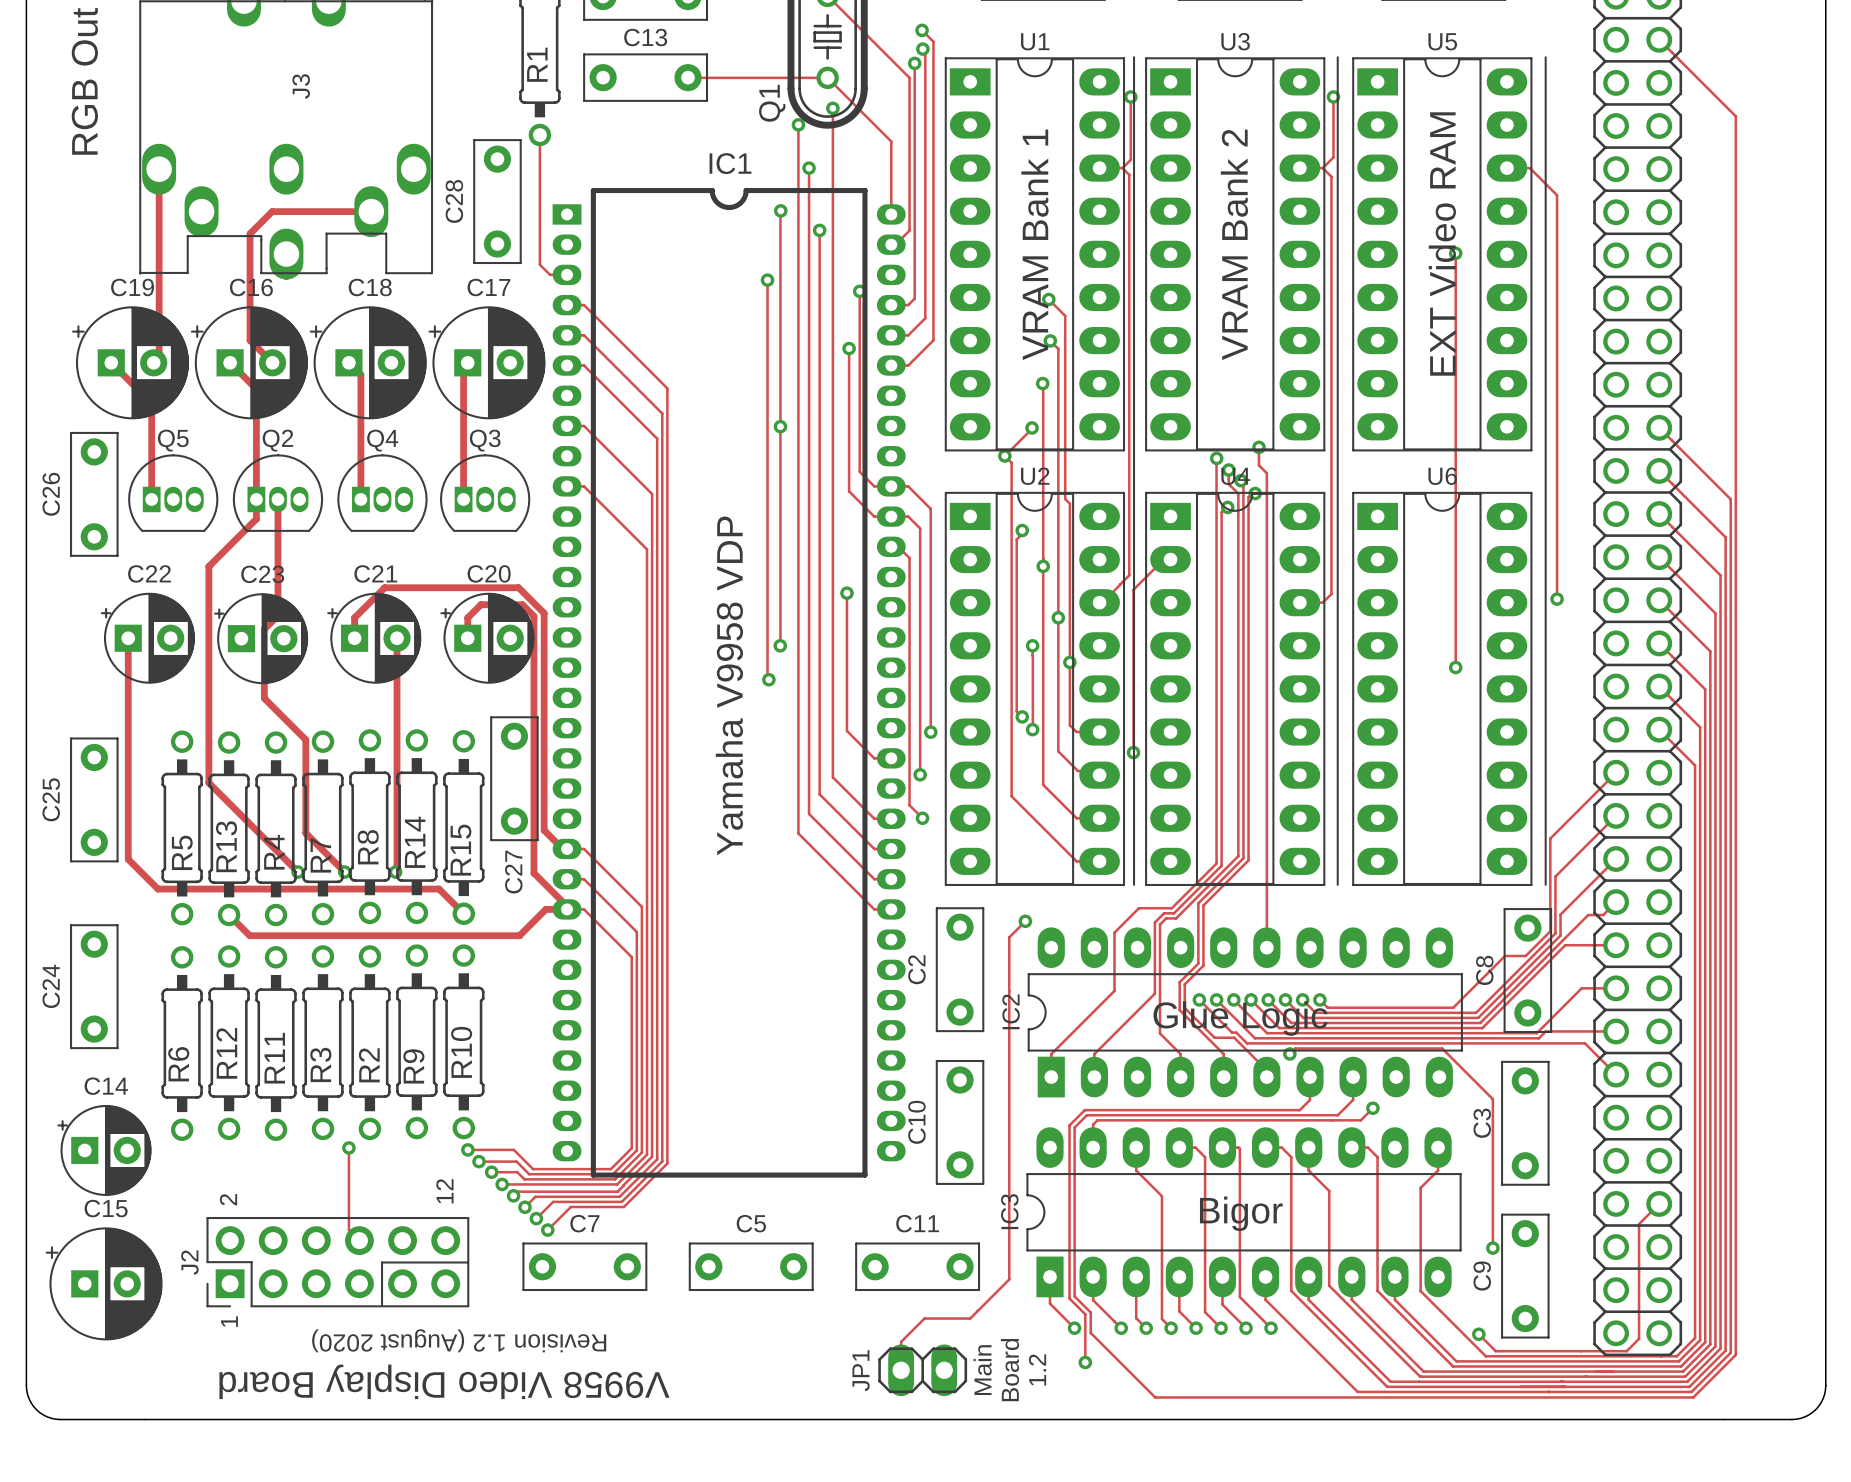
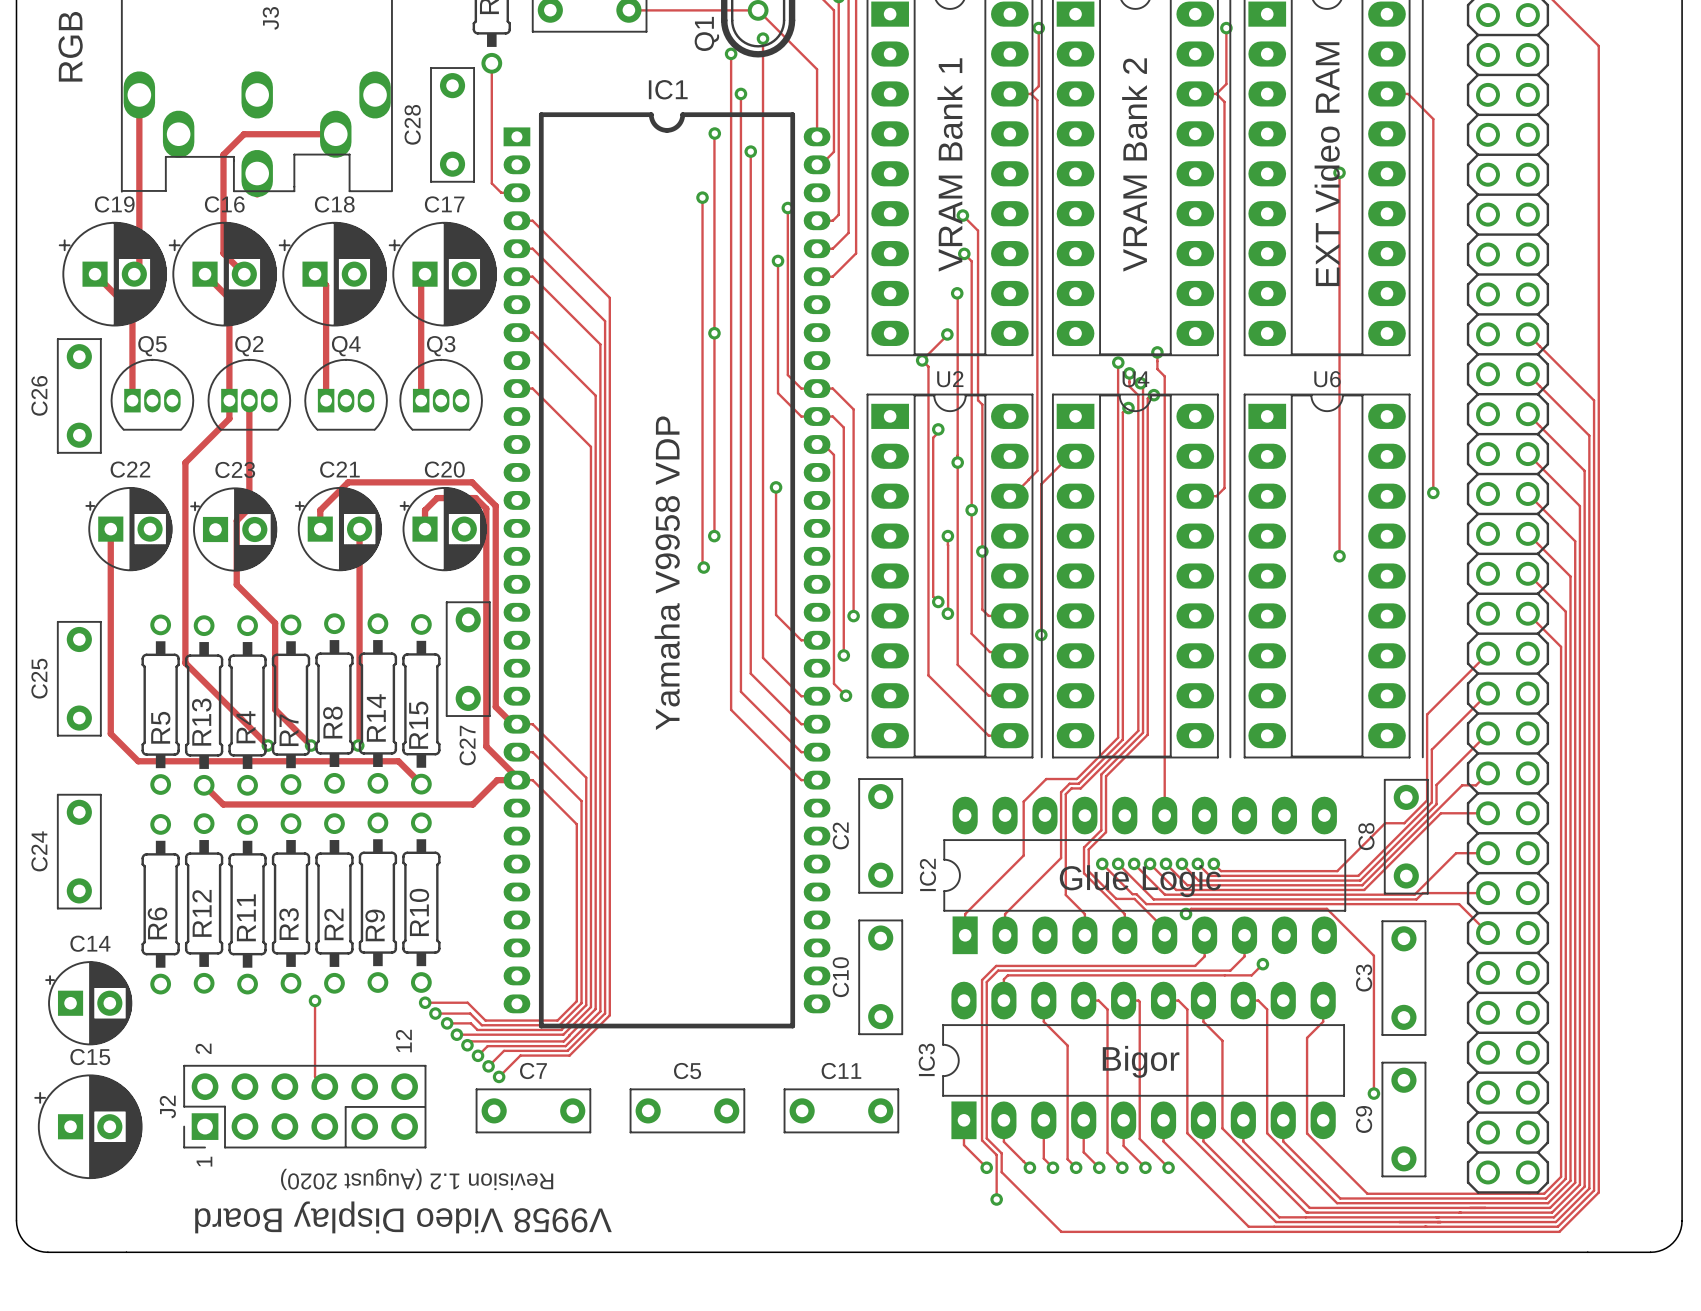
track: (1025, 921) (1009, 937) (1009, 1279) (970, 1318) (924, 1318) (901, 1341) (901, 1370) -> none
via: (1025, 921) -> none
track: (1659, 1203) (1639, 1224) (1639, 1338) (1626, 1351) (1495, 1351) (1478, 1334) -> none
via: (1478, 1334) -> none
text: 1.2 (1037, 1369) -> none
part: (922, 1370) -> none
text: Main (982, 1370) -> none
text: Board (1009, 1370) -> none

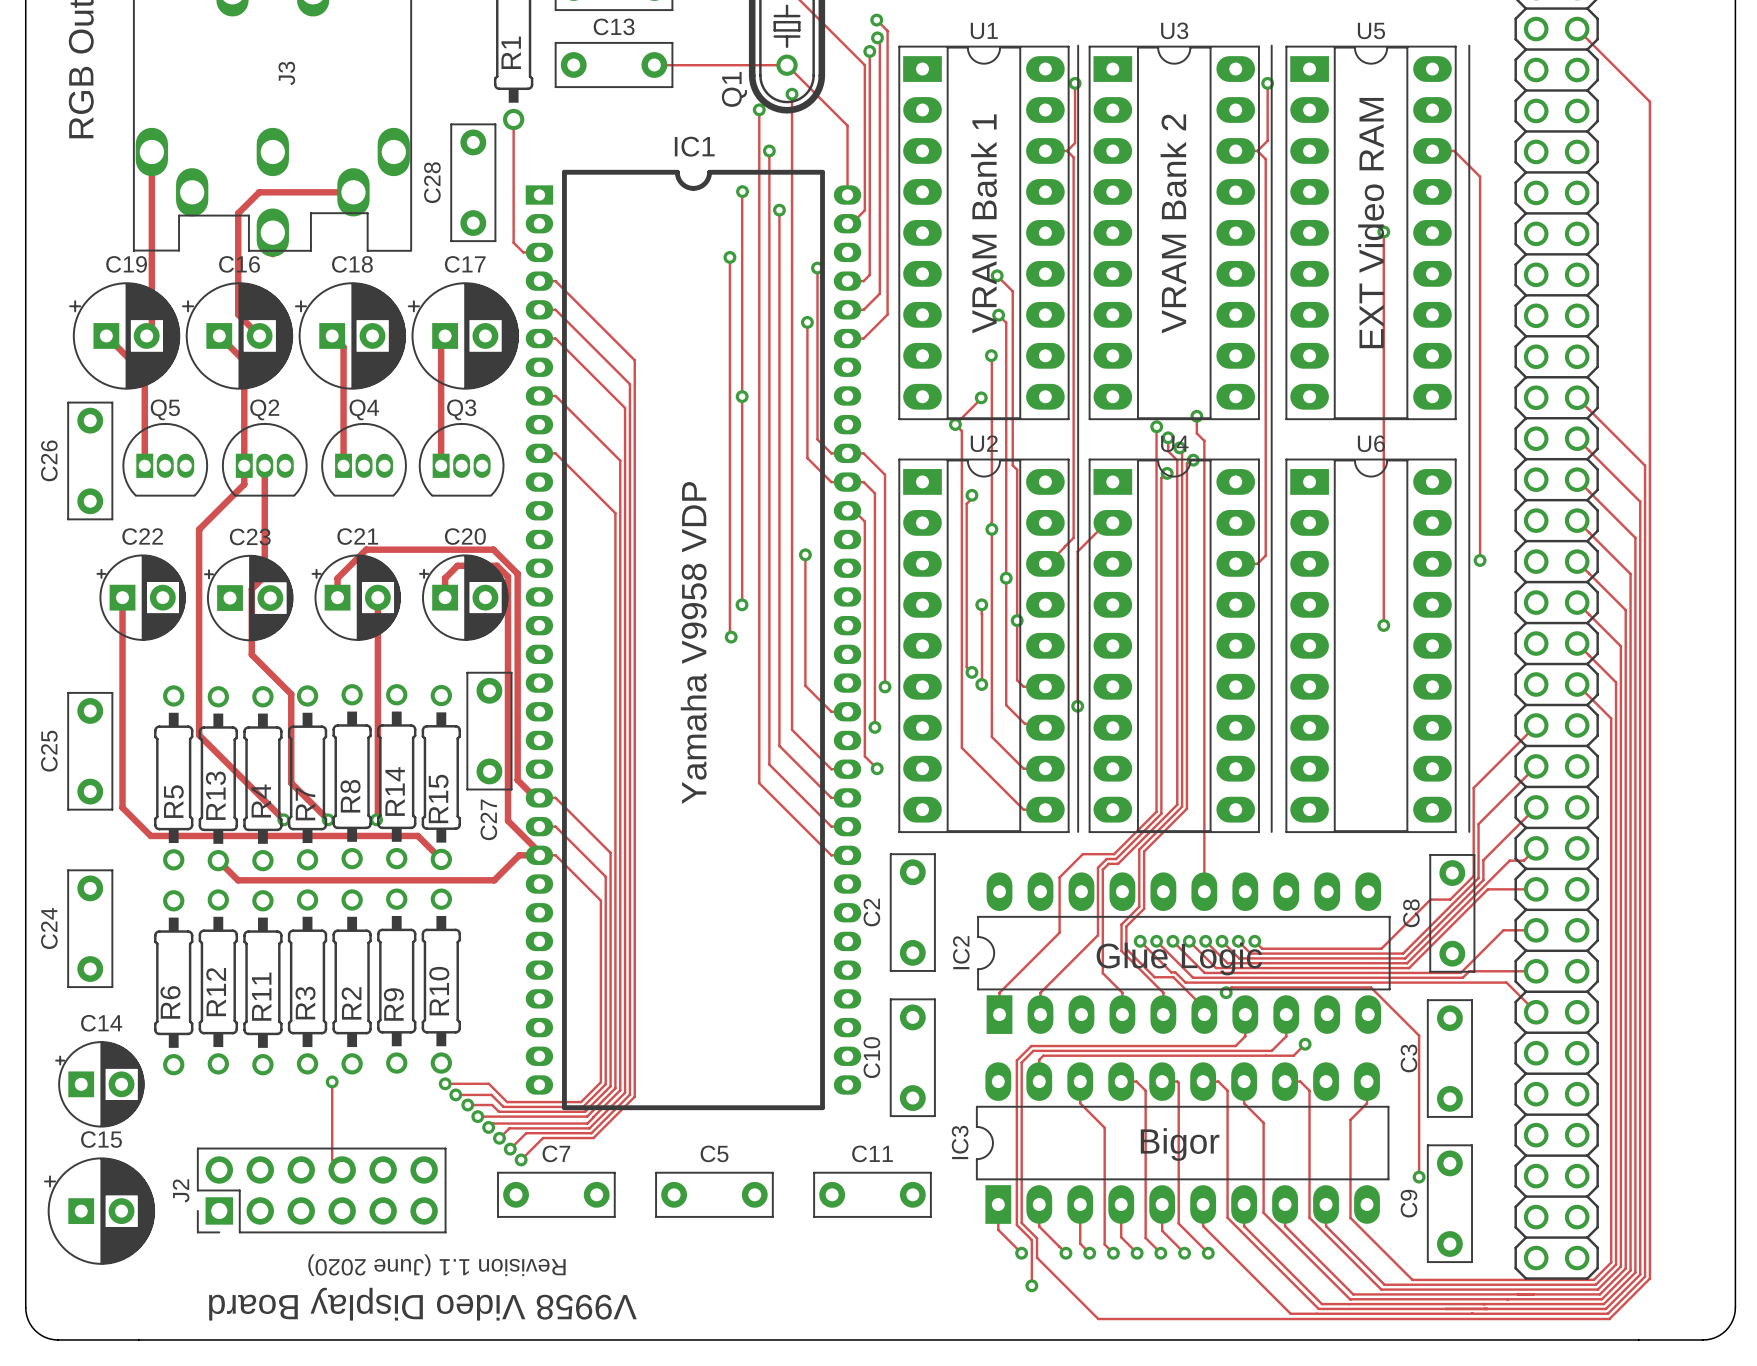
text: 12 (403, 1041) -> none
text: 2 (203, 1048) -> none
line: (425, 1106) (345, 1106) (345, 1147) -> none
text: 1 (204, 1161) -> none
text: Revision 1.2 (August 2020) (417, 1179) -> Revision 1.1 (June 2020) (436, 1265)

